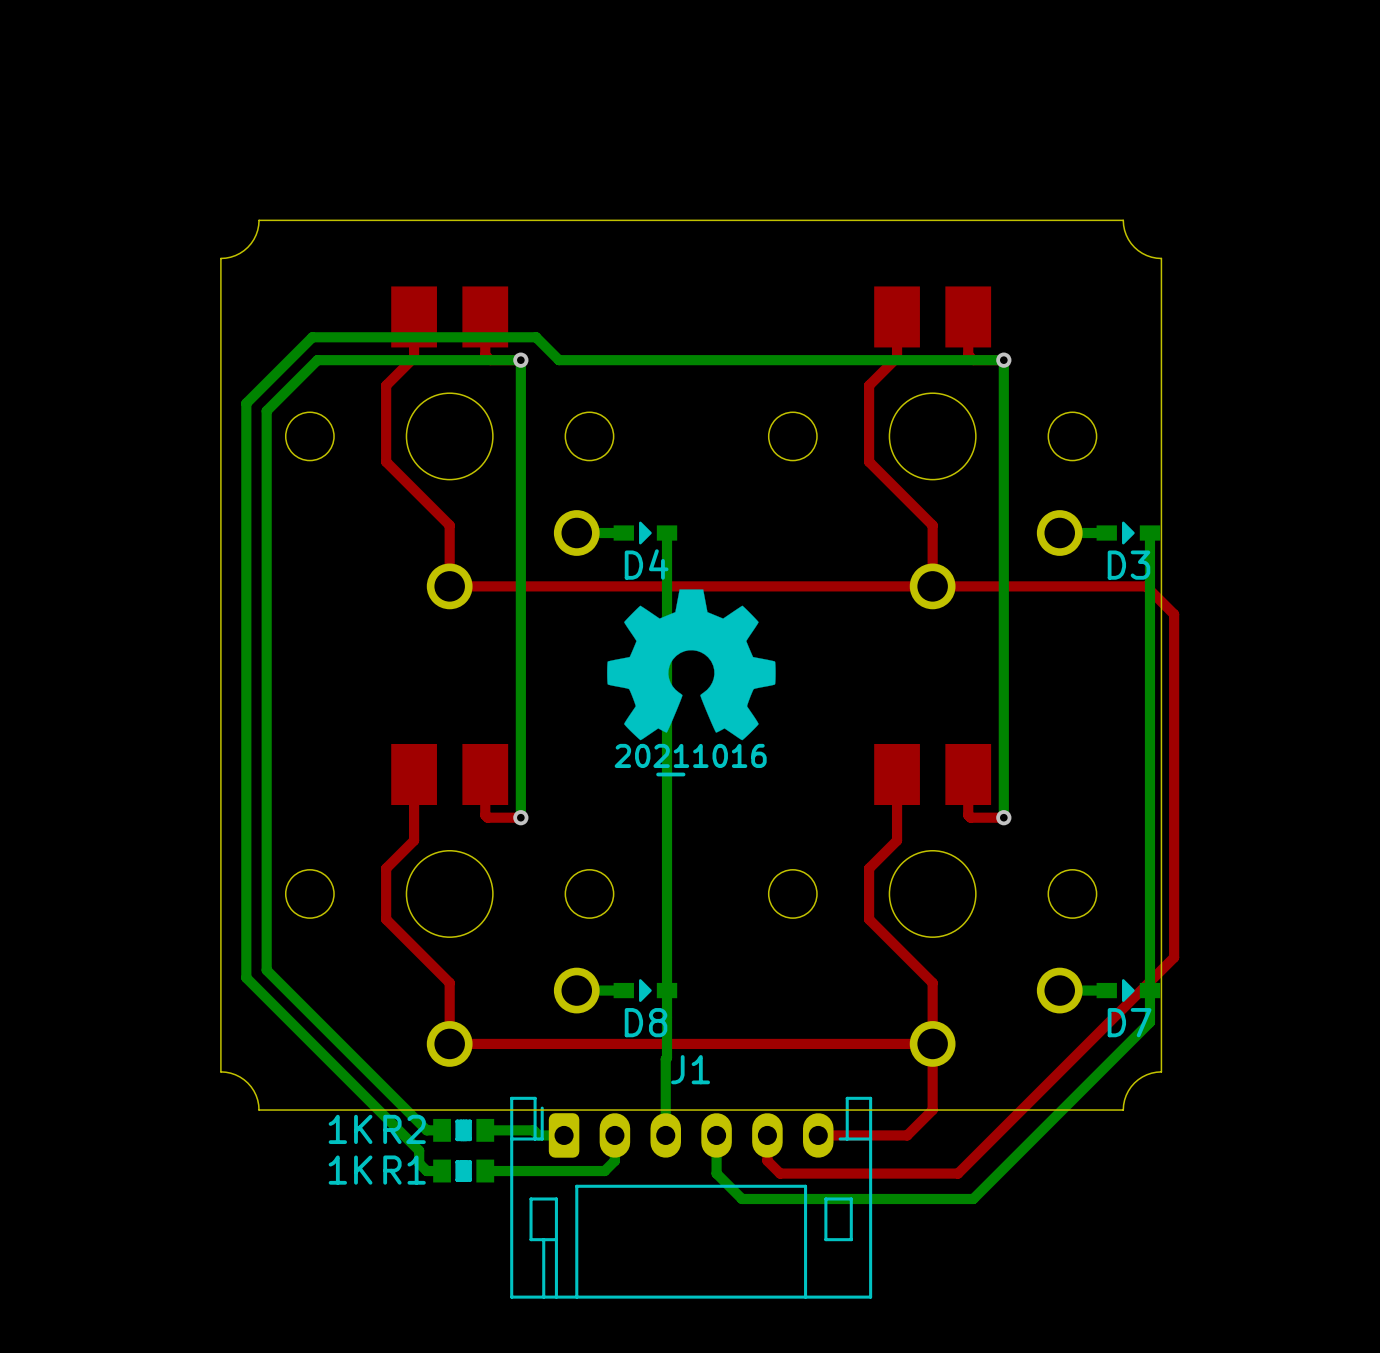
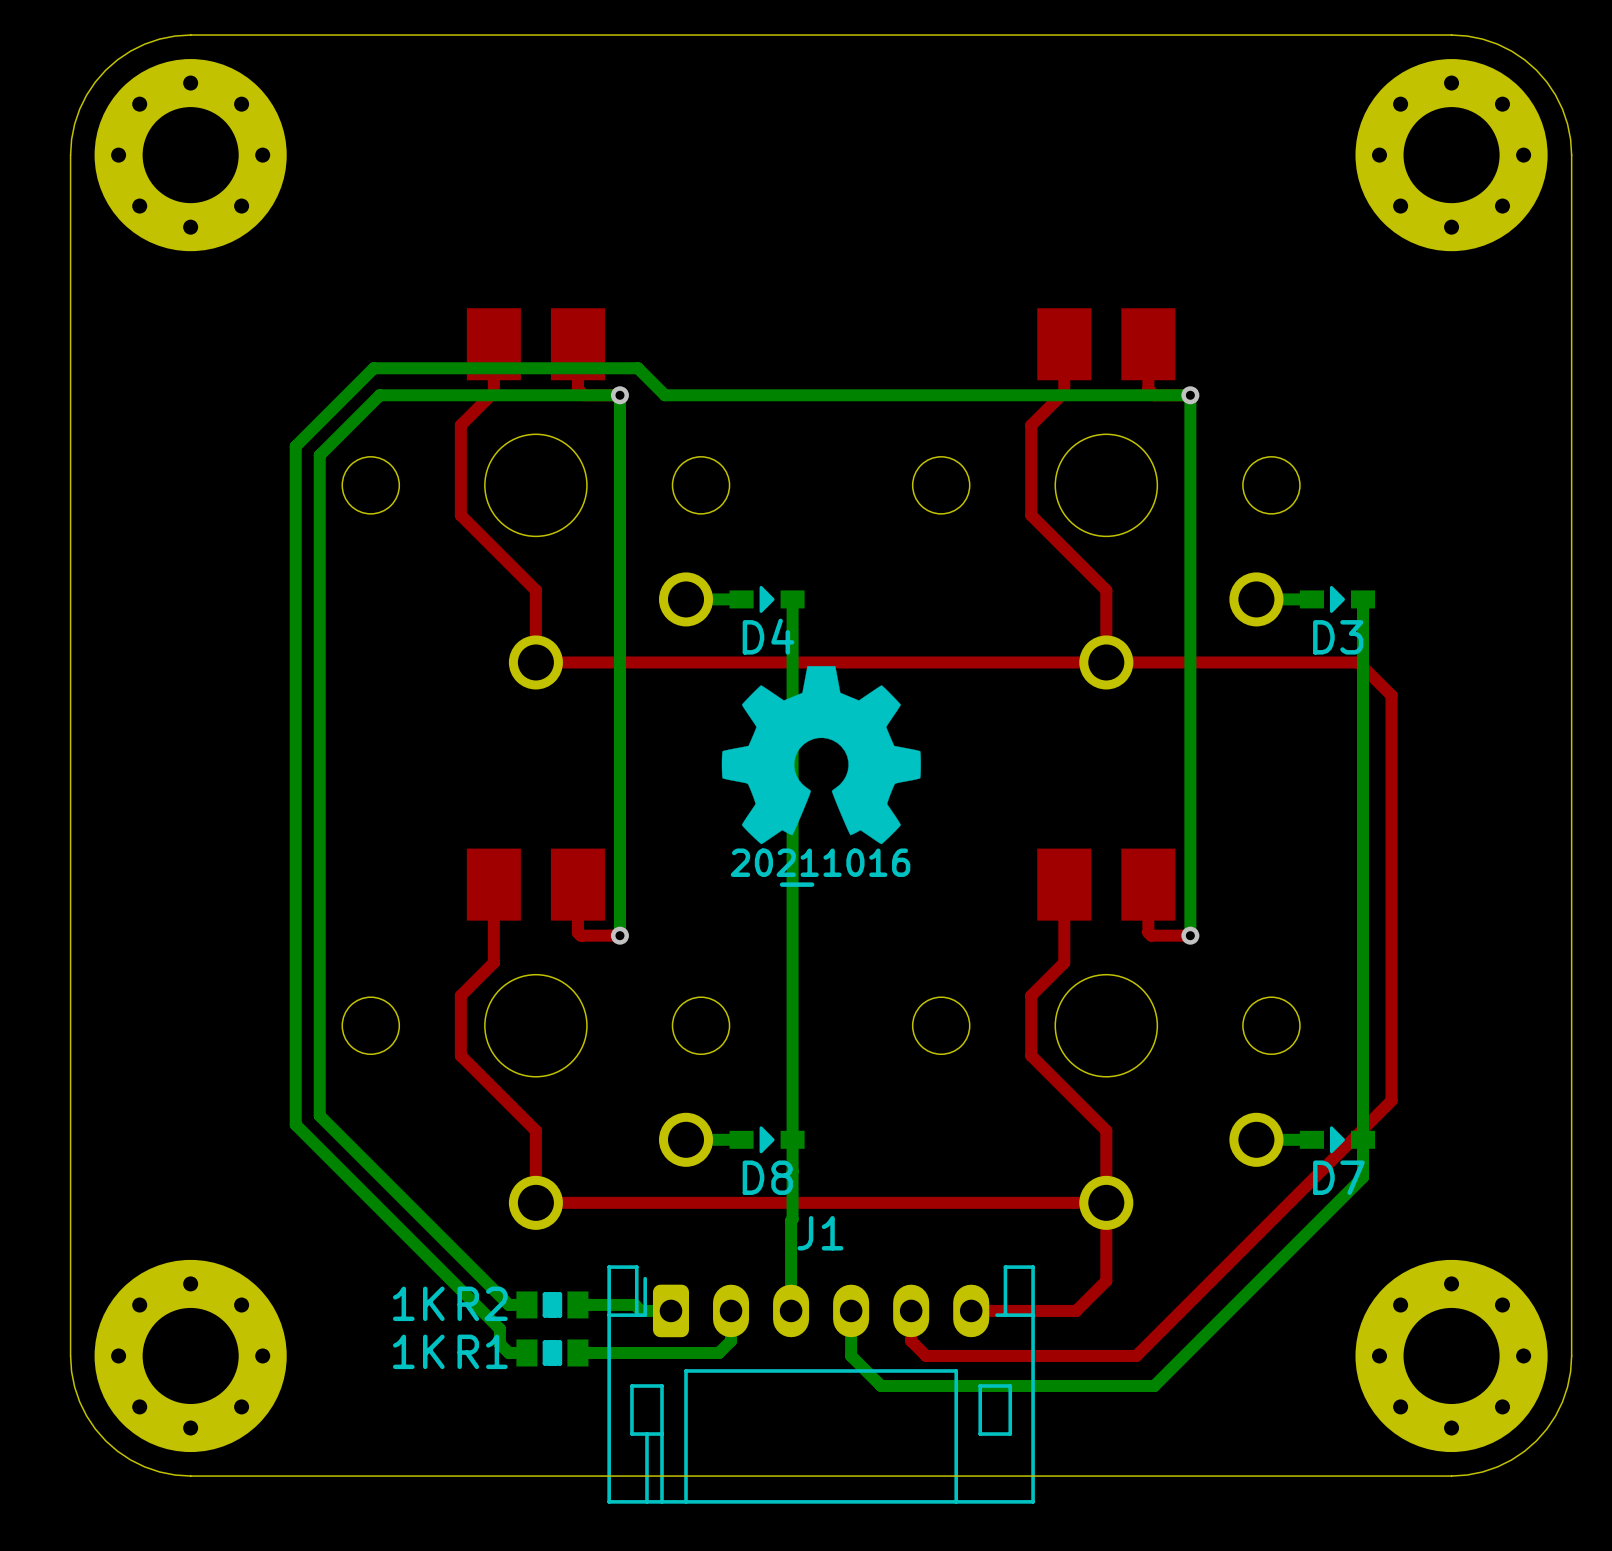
part: none -> (190, 155)
part: none -> (1451, 155)
board edge: (1123, 220) (259, 220) (256, 234) (247, 247) (235, 255) (220, 258) (220, 1071) (235, 1074) (247, 1083) (256, 1095) (259, 1110) (1123, 1110) (1126, 1095) (1134, 1083) (1146, 1074) (1161, 1071) (1161, 258) (1146, 255) (1134, 247) (1126, 234) (1123, 220) -> (1451, 35) (1467, 36) (1497, 44) (1524, 59) (1536, 70) (1555, 95) (1562, 109) (1567, 124) (1571, 155) (1571, 1355) (1567, 1387) (1562, 1401) (1555, 1416) (1536, 1440) (1524, 1451) (1497, 1466) (1482, 1471) (1451, 1476) (190, 1476) (159, 1471) (144, 1466) (117, 1451) (105, 1440) (86, 1416) (79, 1401) (74, 1387) (70, 1355) (70, 155) (74, 124) (79, 109) (86, 95) (105, 70) (117, 59) (144, 44) (174, 36) (190, 35) (1451, 35)
part: none -> (190, 1355)
part: none -> (1451, 1355)

